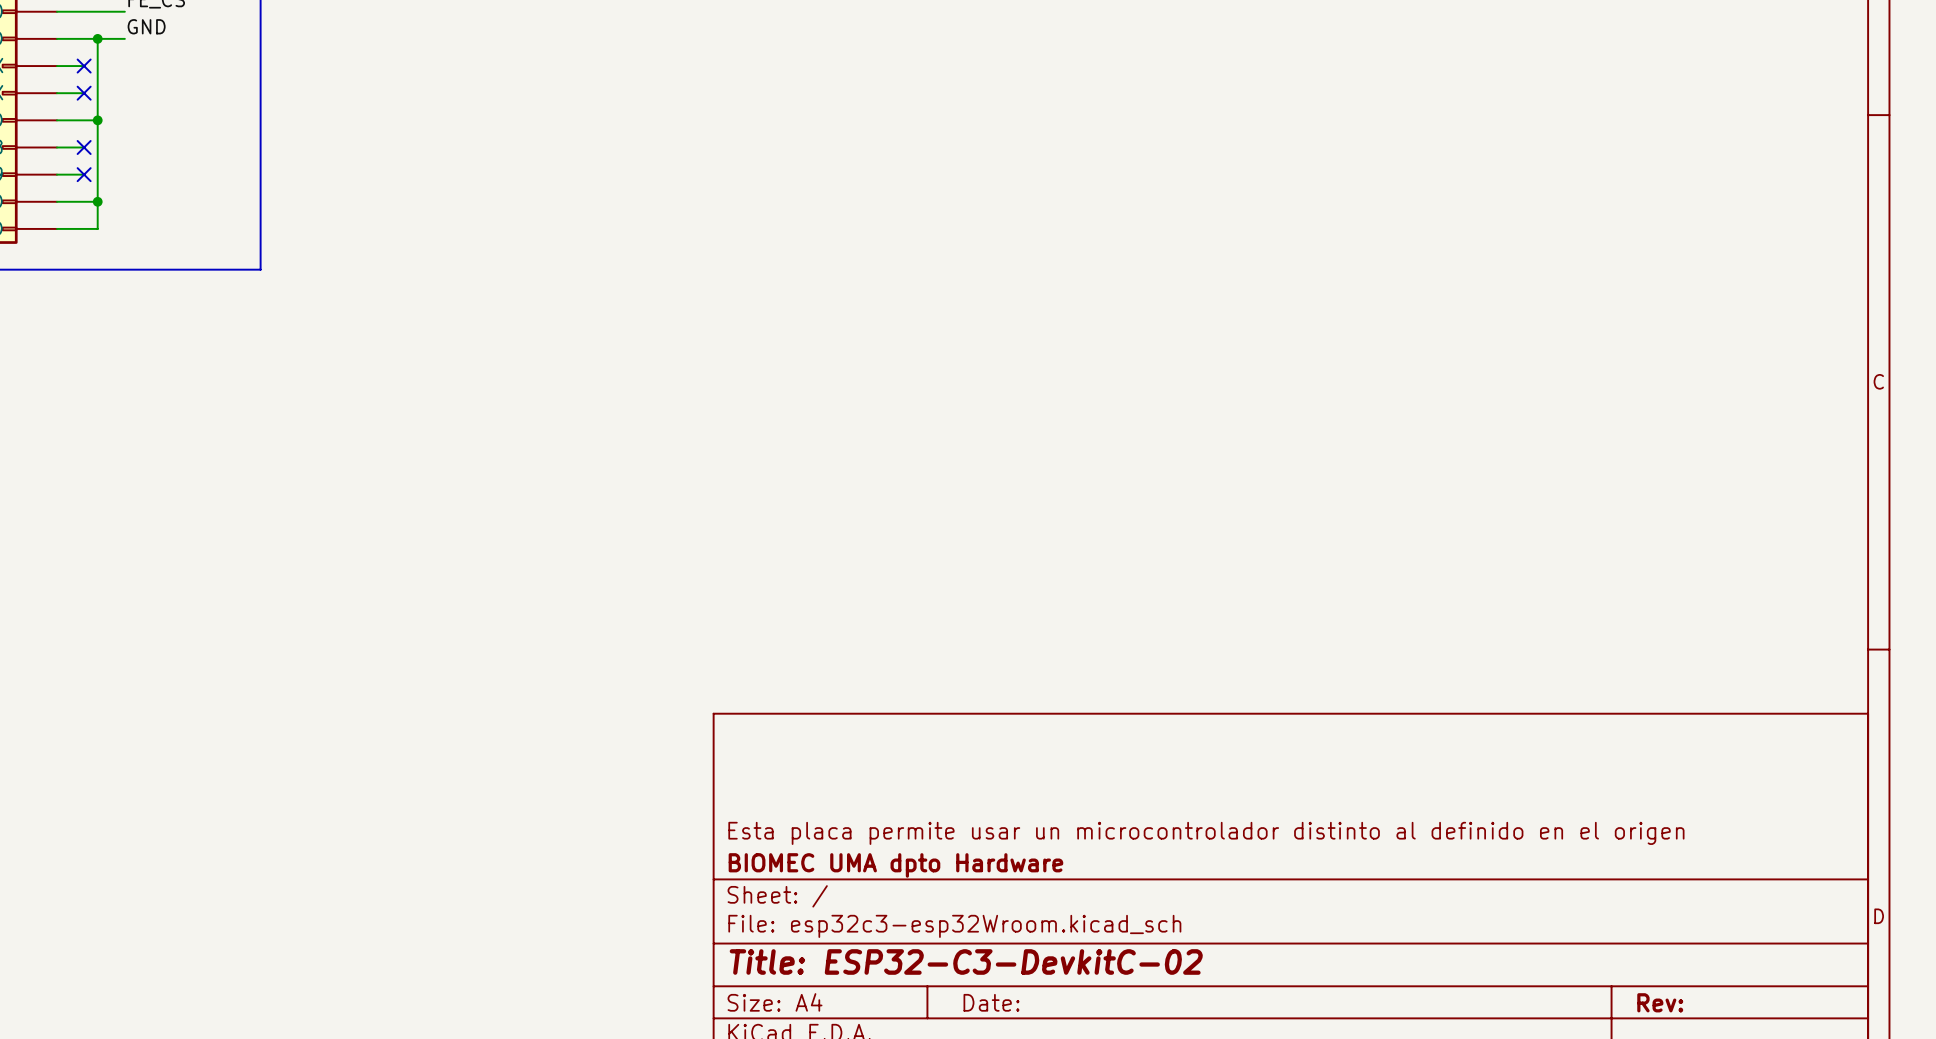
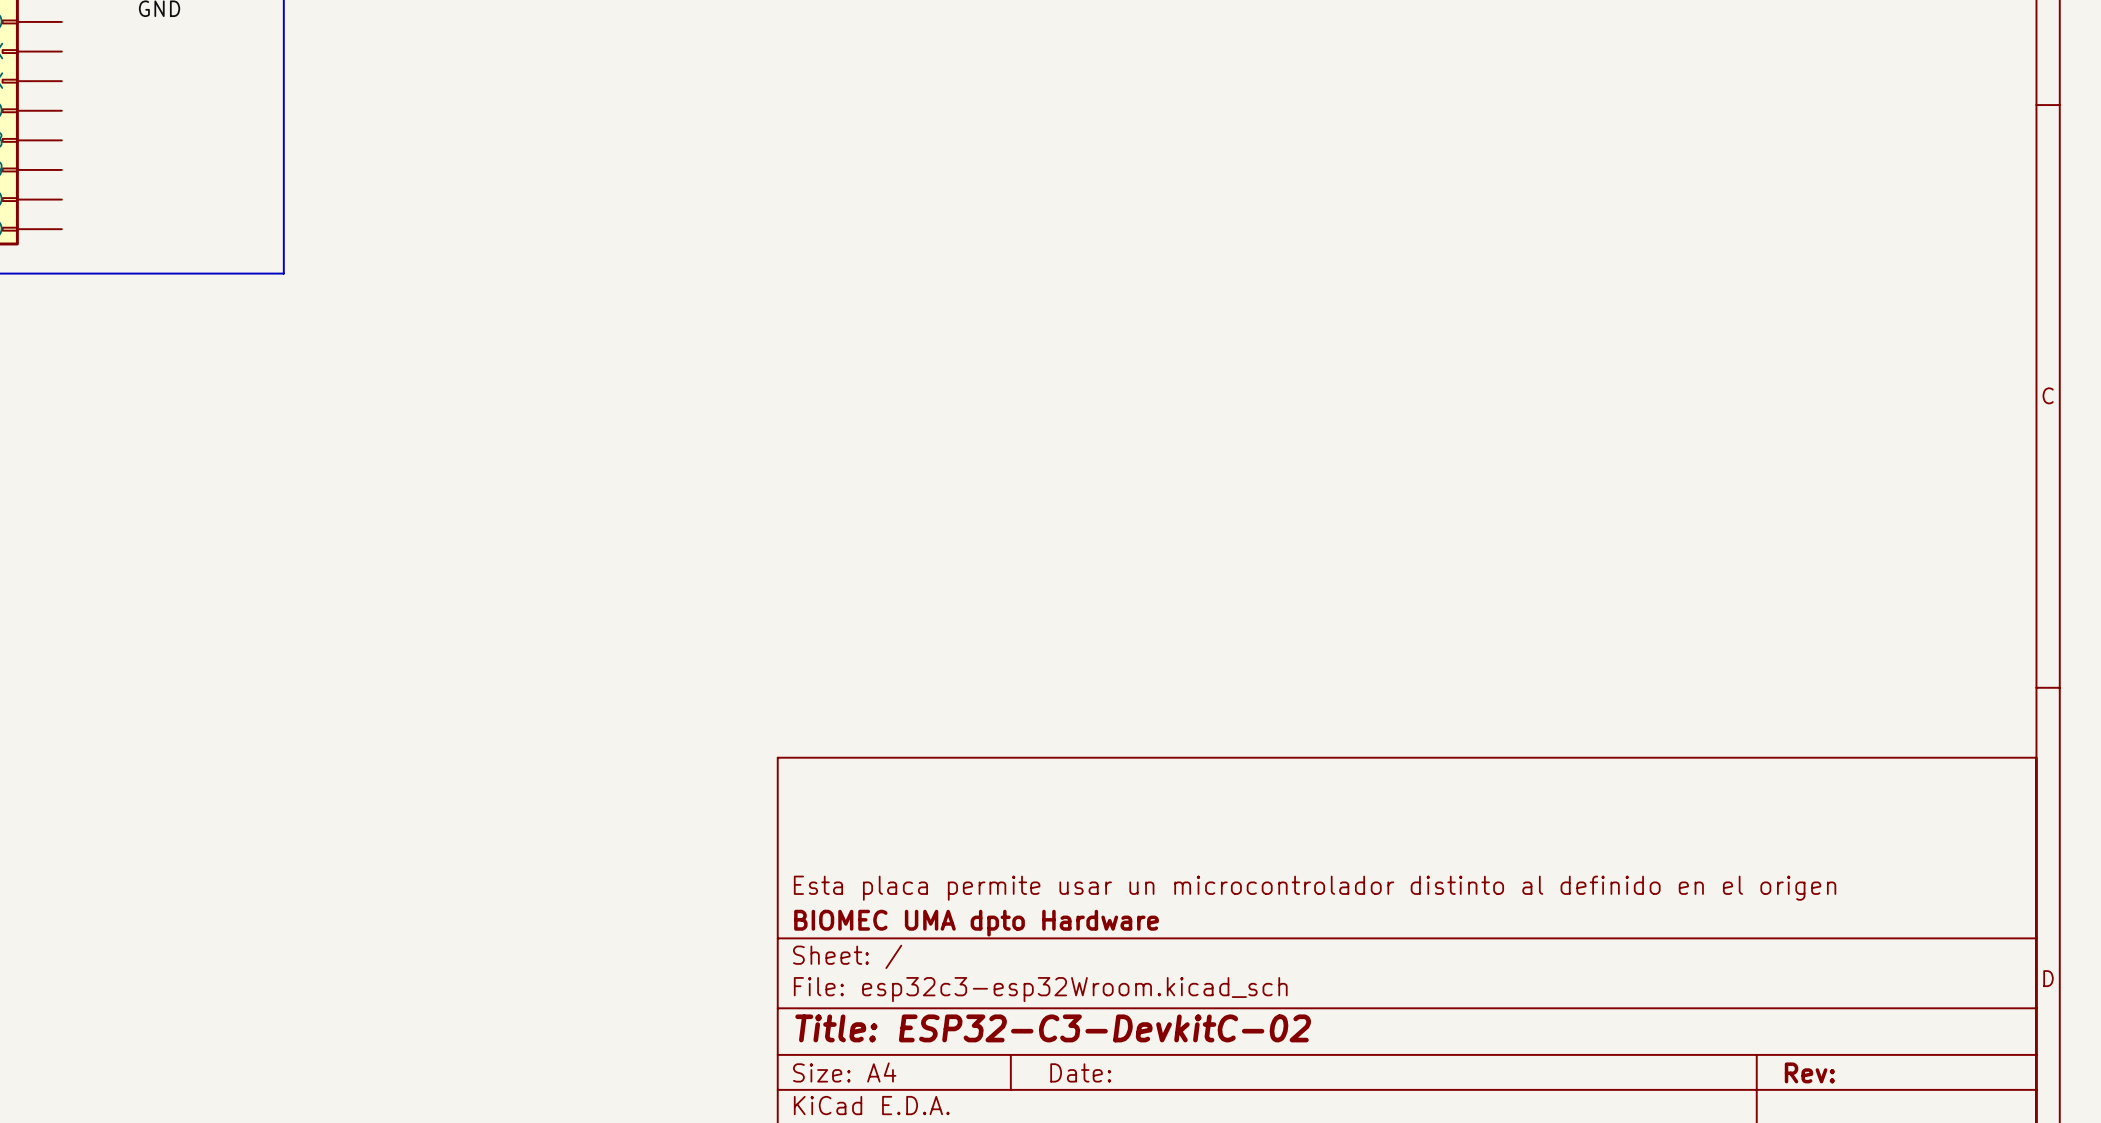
wire: (56, 38) (124, 38) -> none
wire: (97, 38) (97, 228) (56, 228) -> none
junction: (97, 38) -> none
wire: (56, 66) (84, 66) -> none
no-connect mark: (84, 66) -> none
wire: (56, 93) (84, 93) -> none
no-connect mark: (84, 93) -> none
wire: (56, 120) (97, 120) -> none
junction: (97, 120) -> none
wire: (56, 147) (84, 147) -> none
no-connect mark: (84, 147) -> none
wire: (56, 174) (84, 174) -> none
no-connect mark: (84, 174) -> none
wire: (56, 201) (97, 201) -> none
junction: (97, 201) -> none

